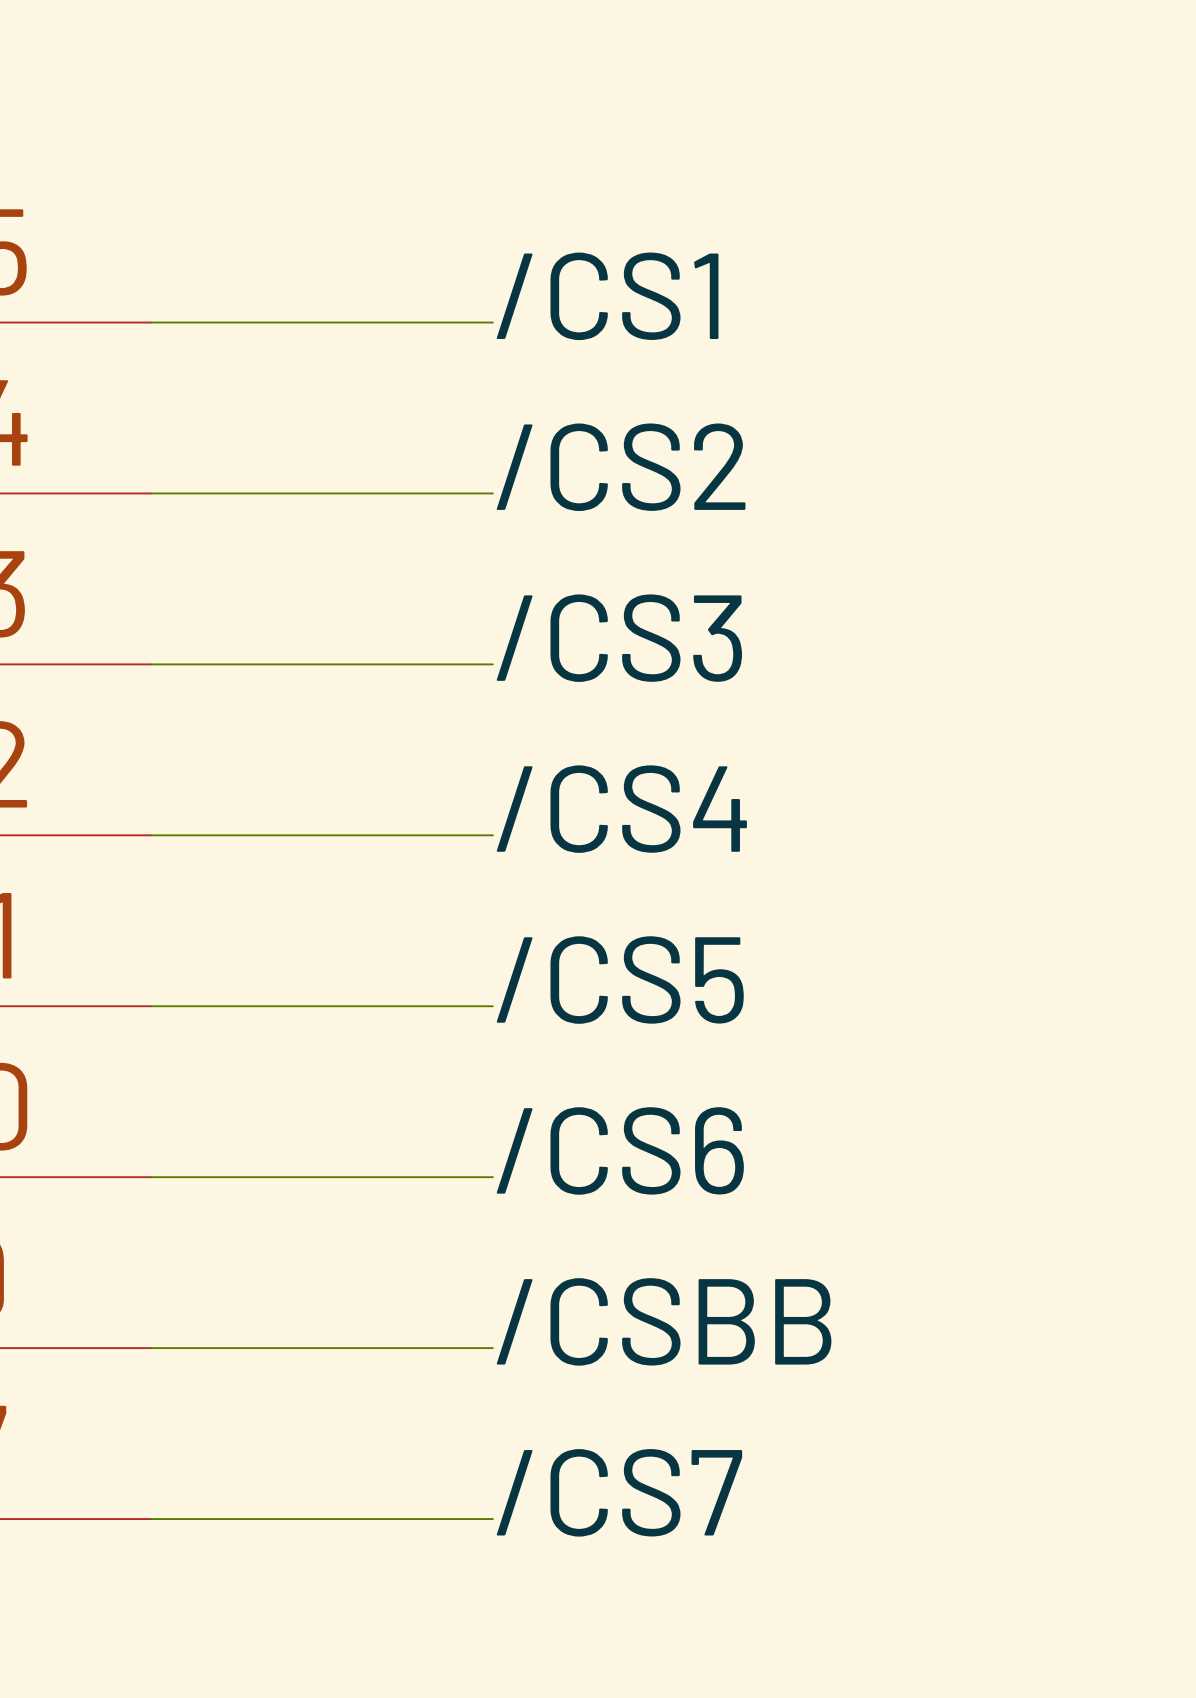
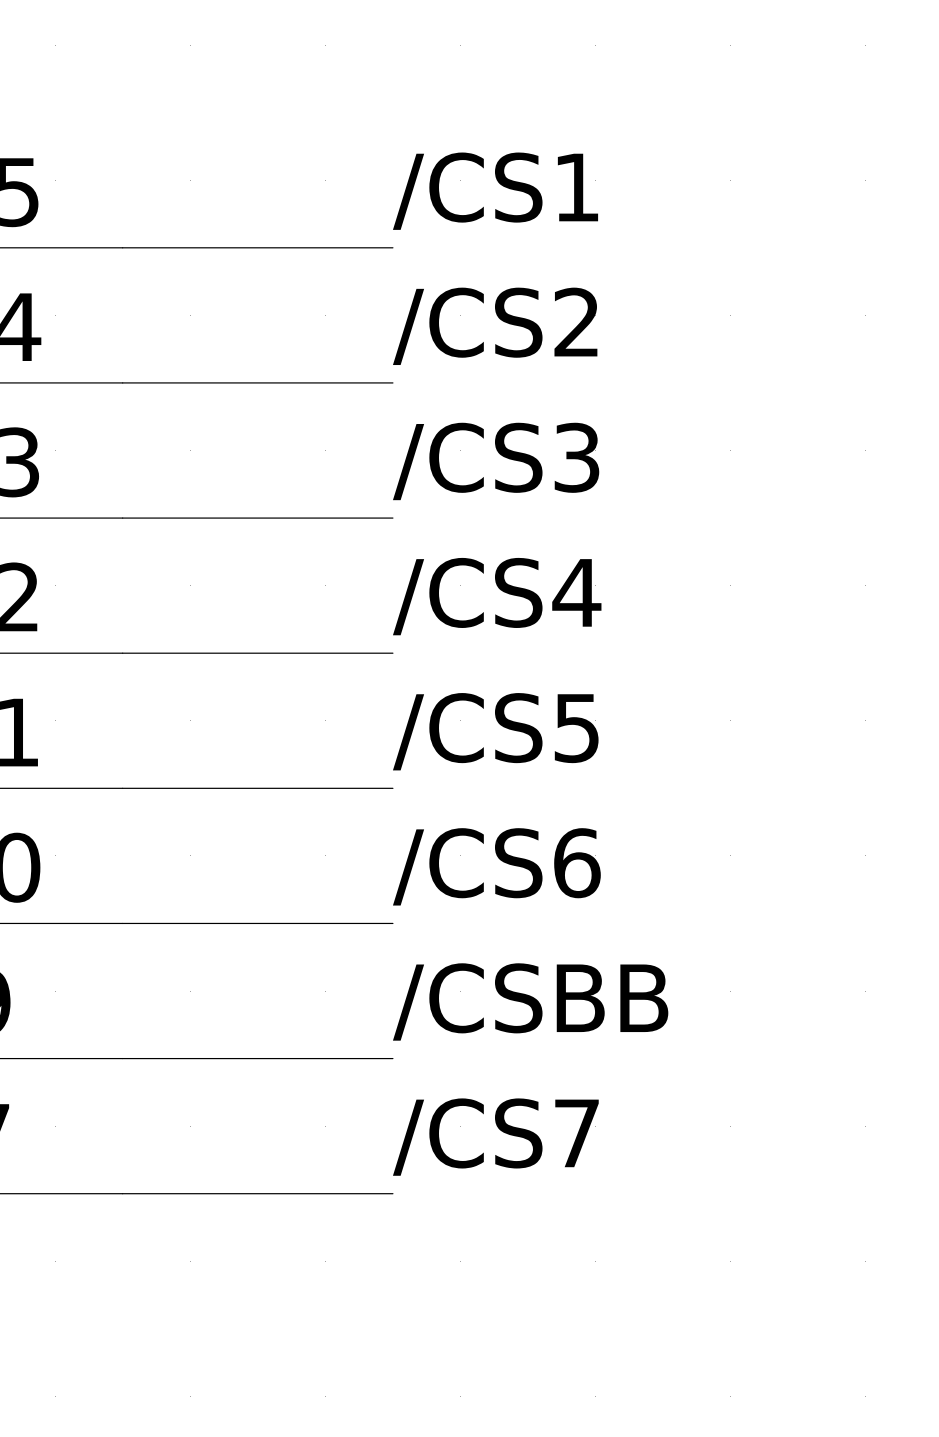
label position: /CS1 (607, 296) -> /CS1 (495, 191)
label position: /CS2 (620, 467) -> /CS2 (495, 326)
label position: /CS3 (619, 638) -> /CS3 (496, 461)
label position: /CS4 (621, 809) -> /CS4 (497, 596)
label position: /CS5 (620, 980) -> /CS5 (495, 731)
label position: /CS6 (620, 1150) -> /CS6 (496, 866)
label position: /CSBB (663, 1321) -> /CSBB (530, 1001)
label position: /CS7 (619, 1492) -> /CS7 (495, 1137)

